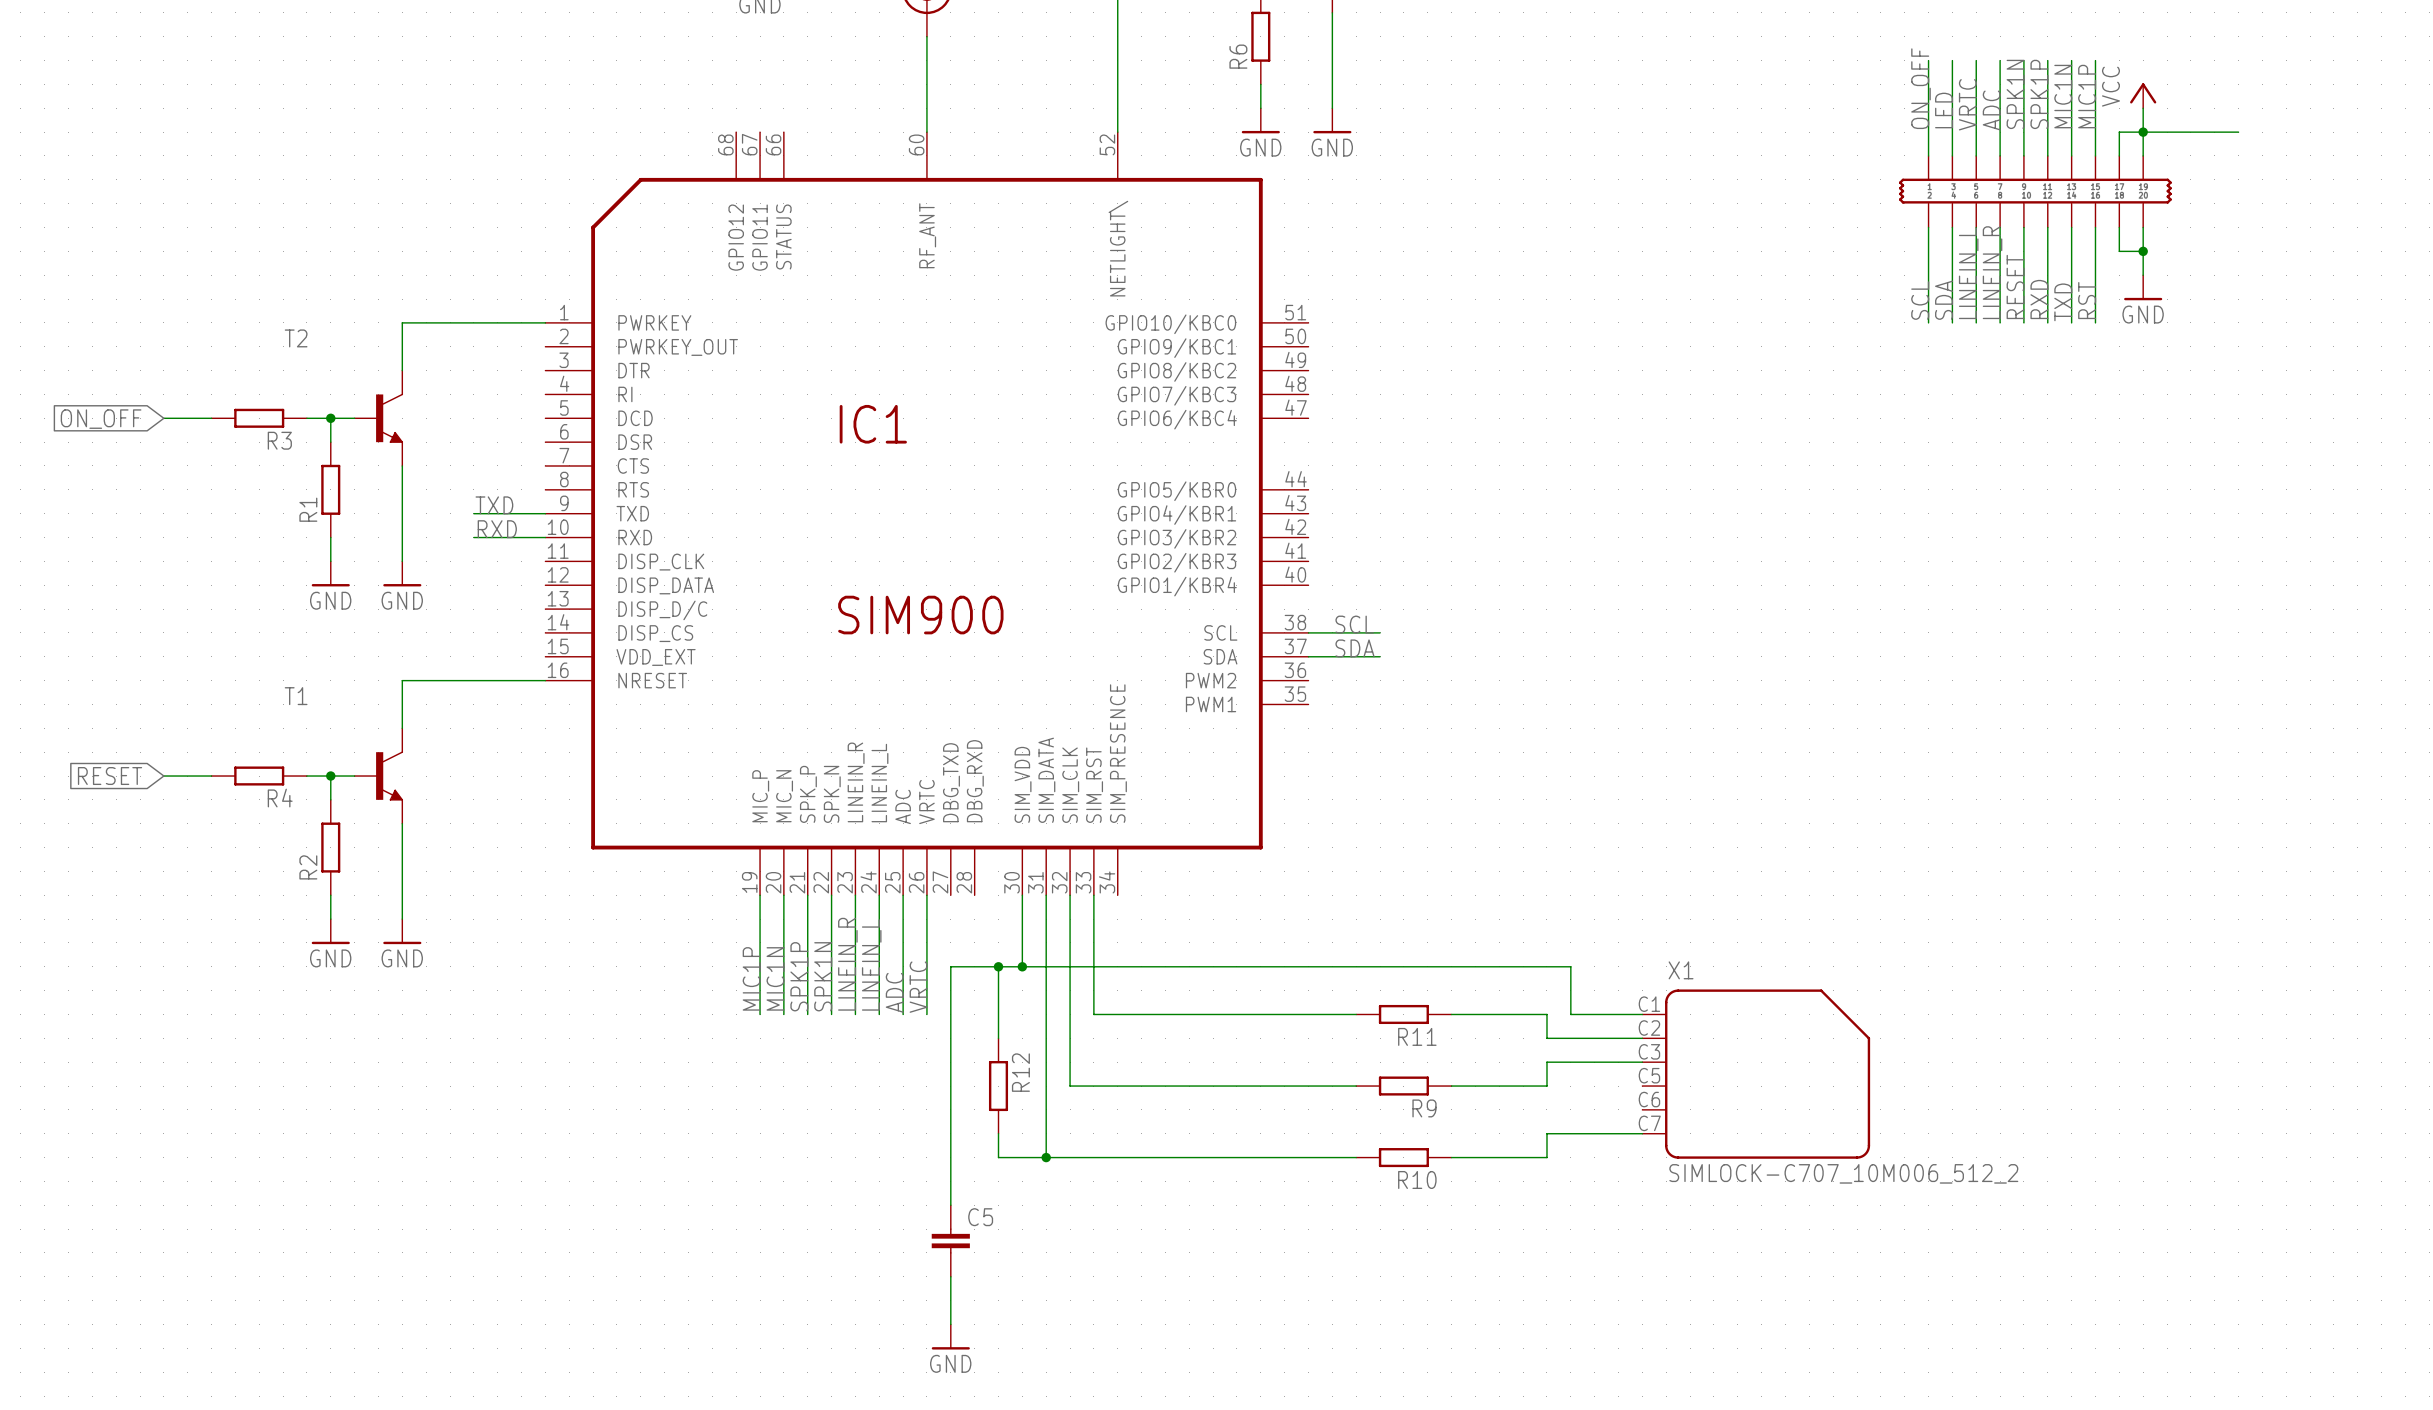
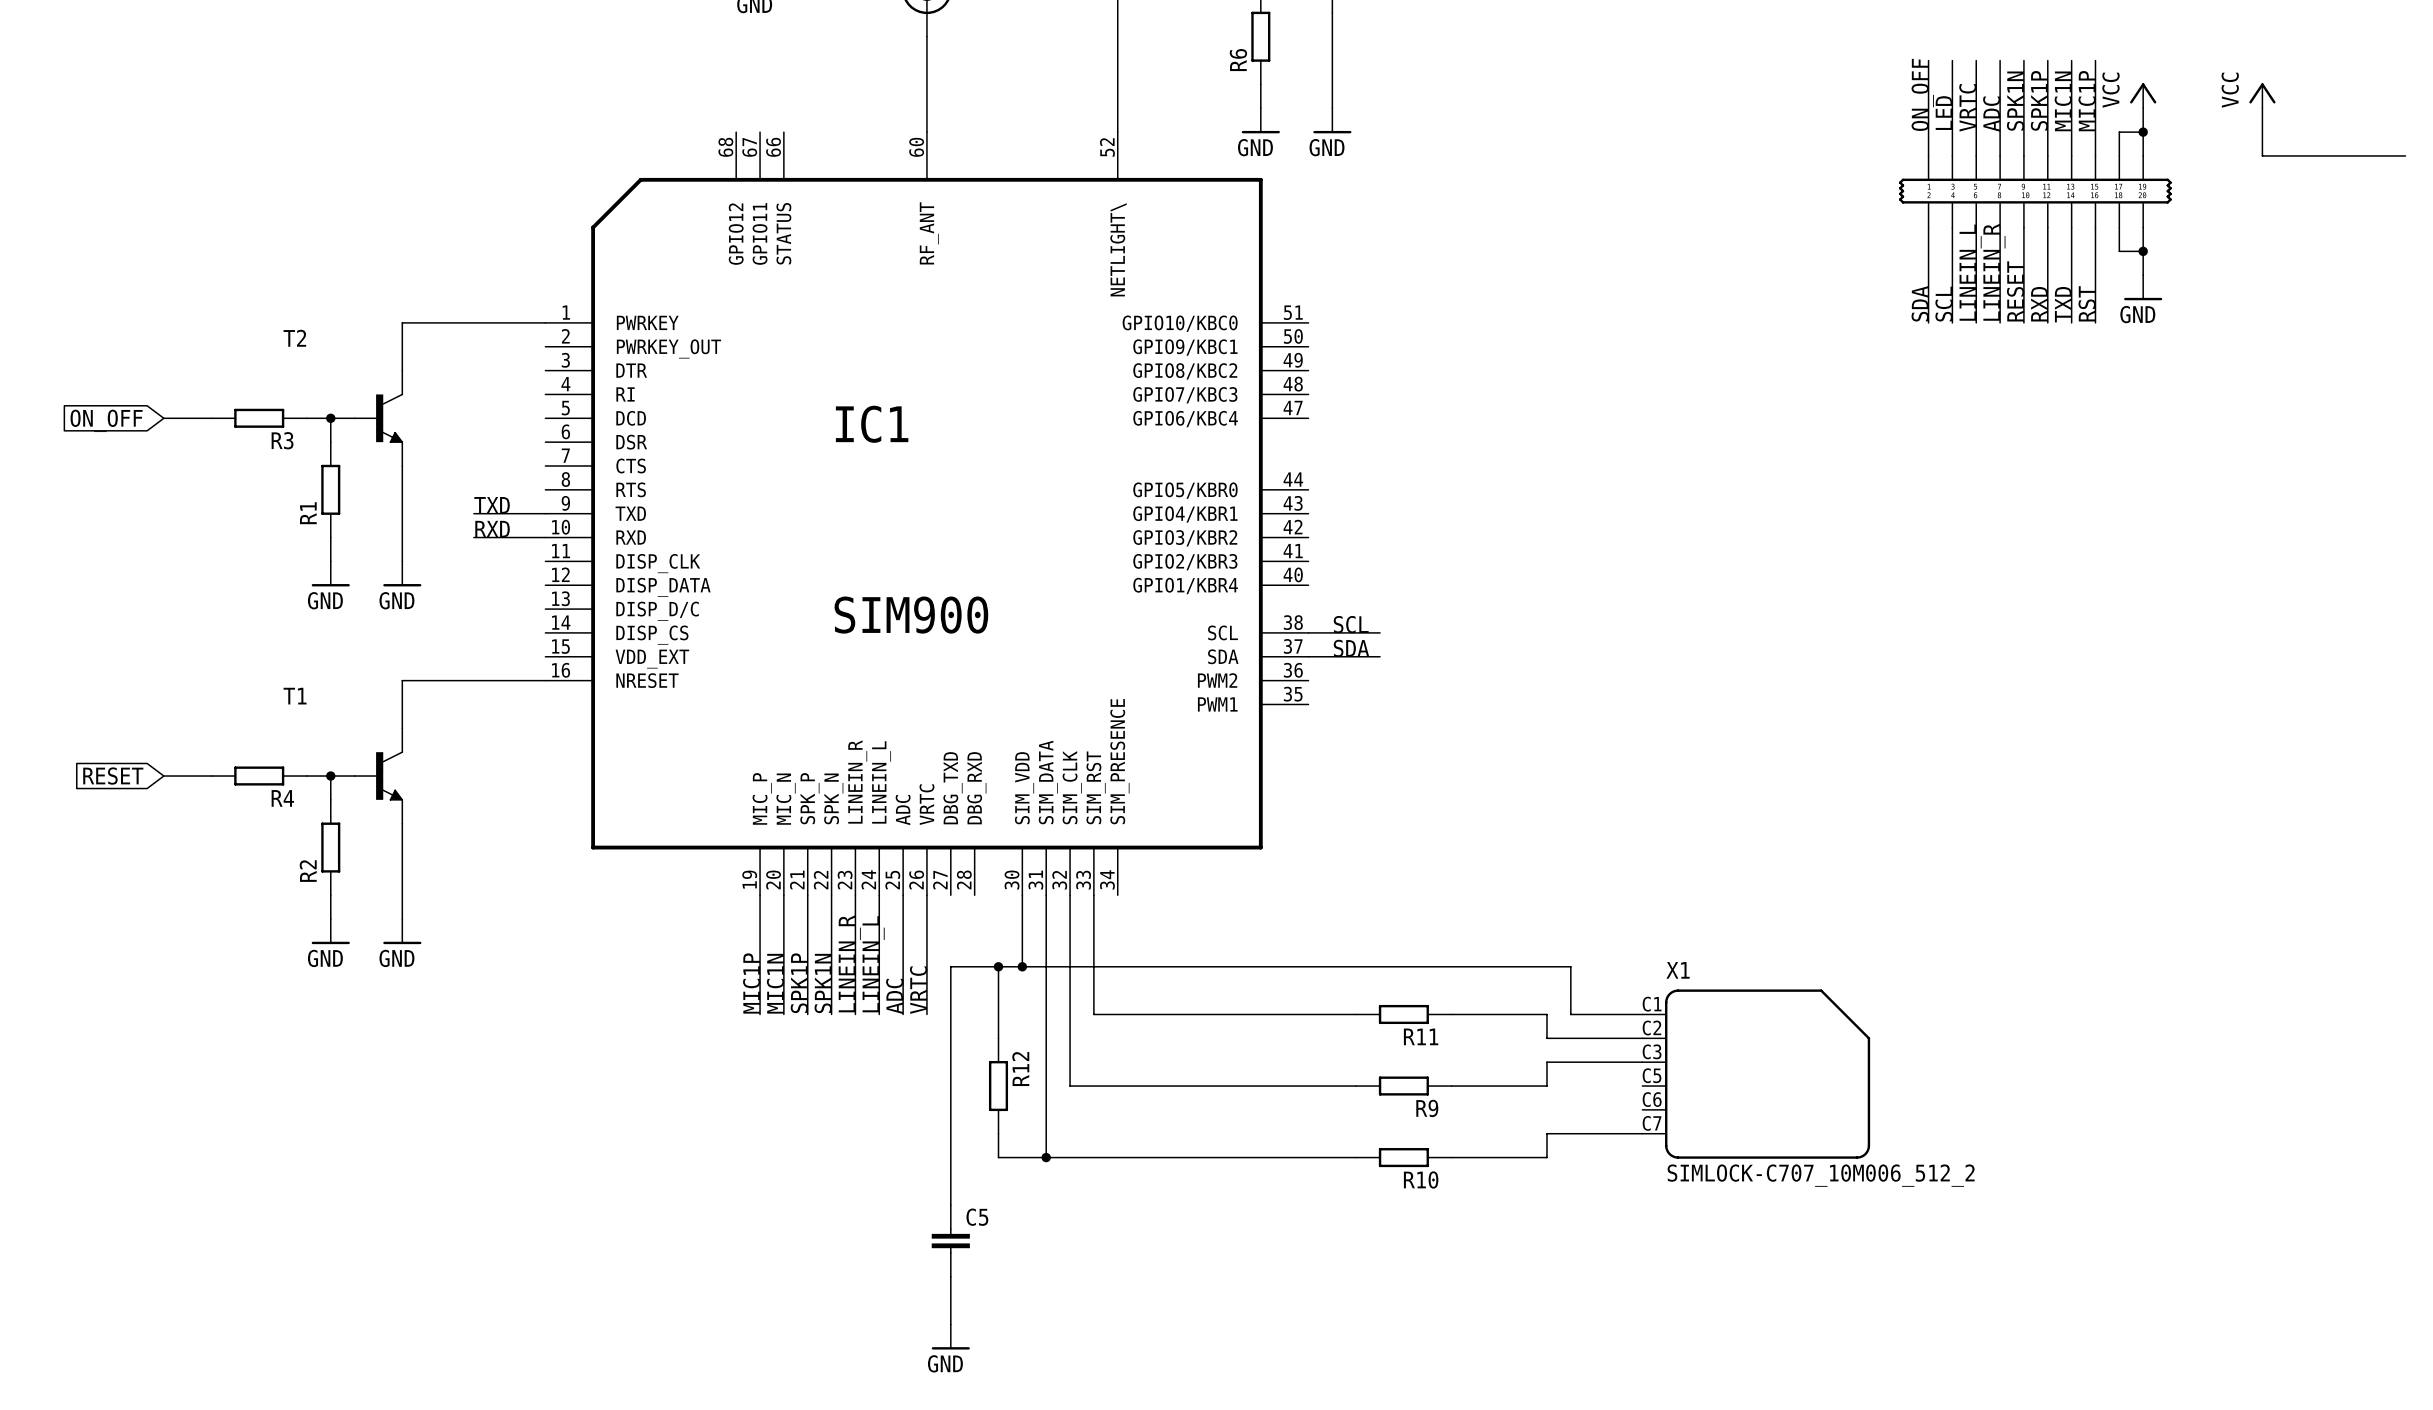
power symbol: none -> VCC (2262, 95)
wire: none -> (2262, 108) (2262, 155) (2405, 155)
wire: (2143, 132) (2238, 132) -> none
label: SCL (1920, 300) -> SDA (1920, 303)
label: SDA (1944, 300) -> SCL (1944, 304)

